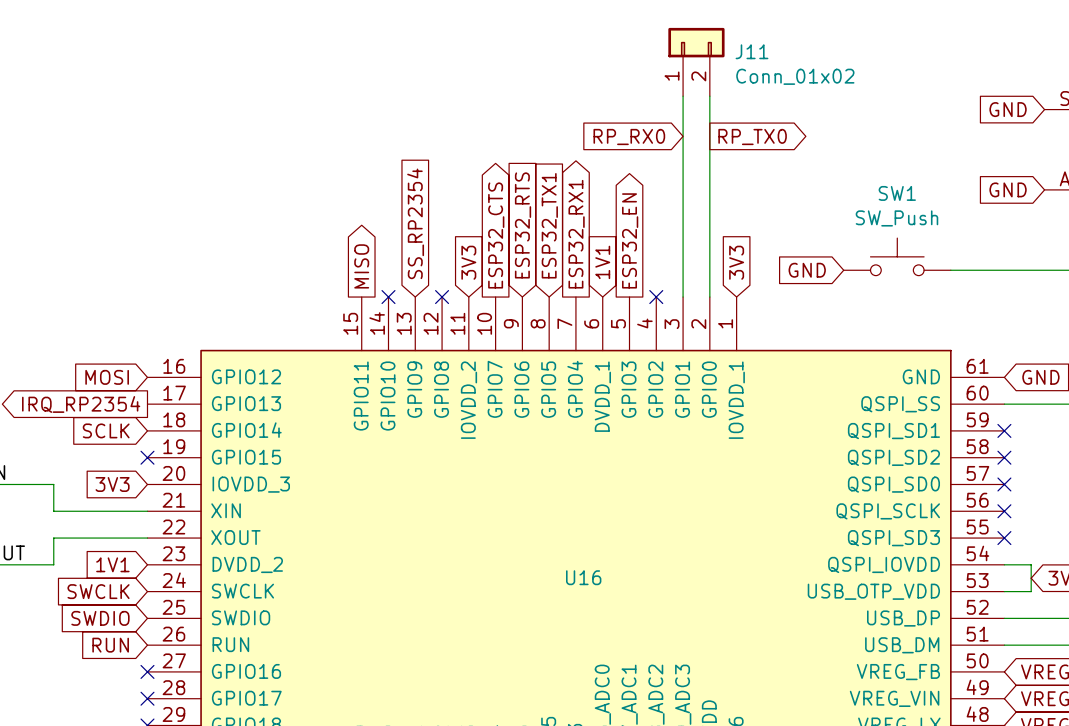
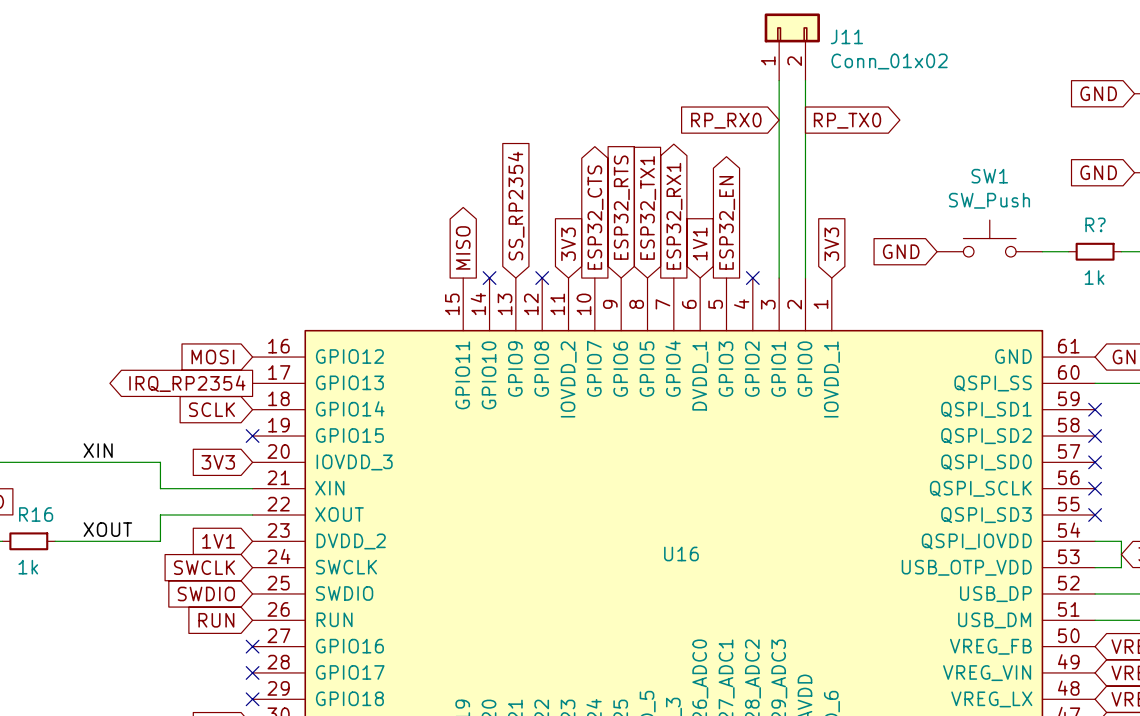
wire: (977, 270) (1031, 270) -> none
R?: none -> 1k (1095, 251)

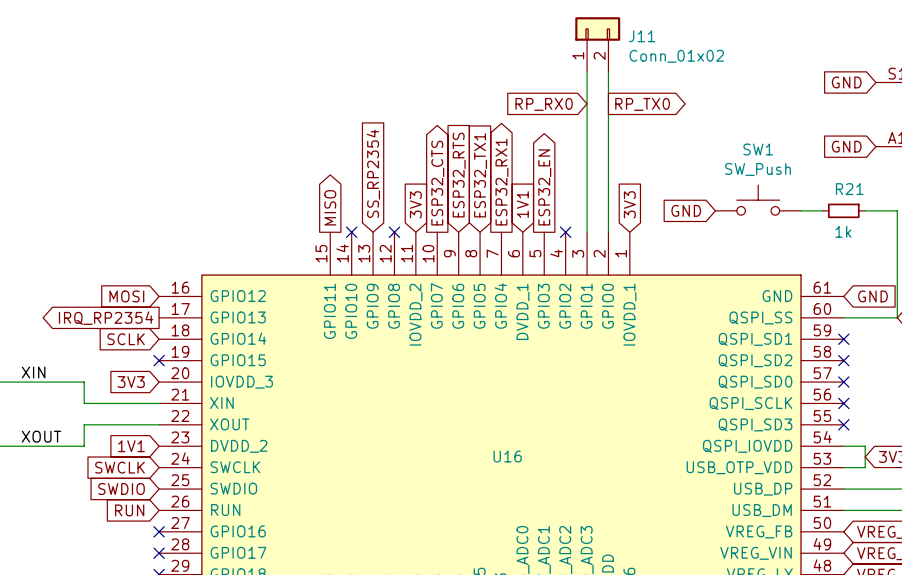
R? name: R? (1095, 224) -> R21 (849, 189)

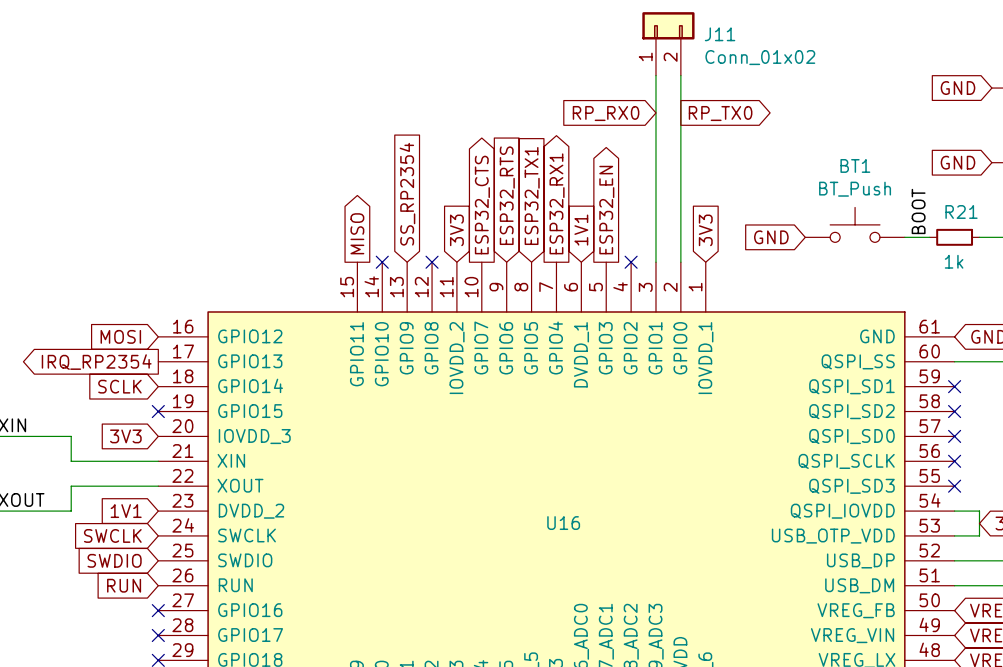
SW1 name: SW1 (758, 149) -> BT1 (855, 165)
SW1 value: SW_Push (757, 169) -> BT_Push (855, 189)
label: none -> BOOT (918, 211)

